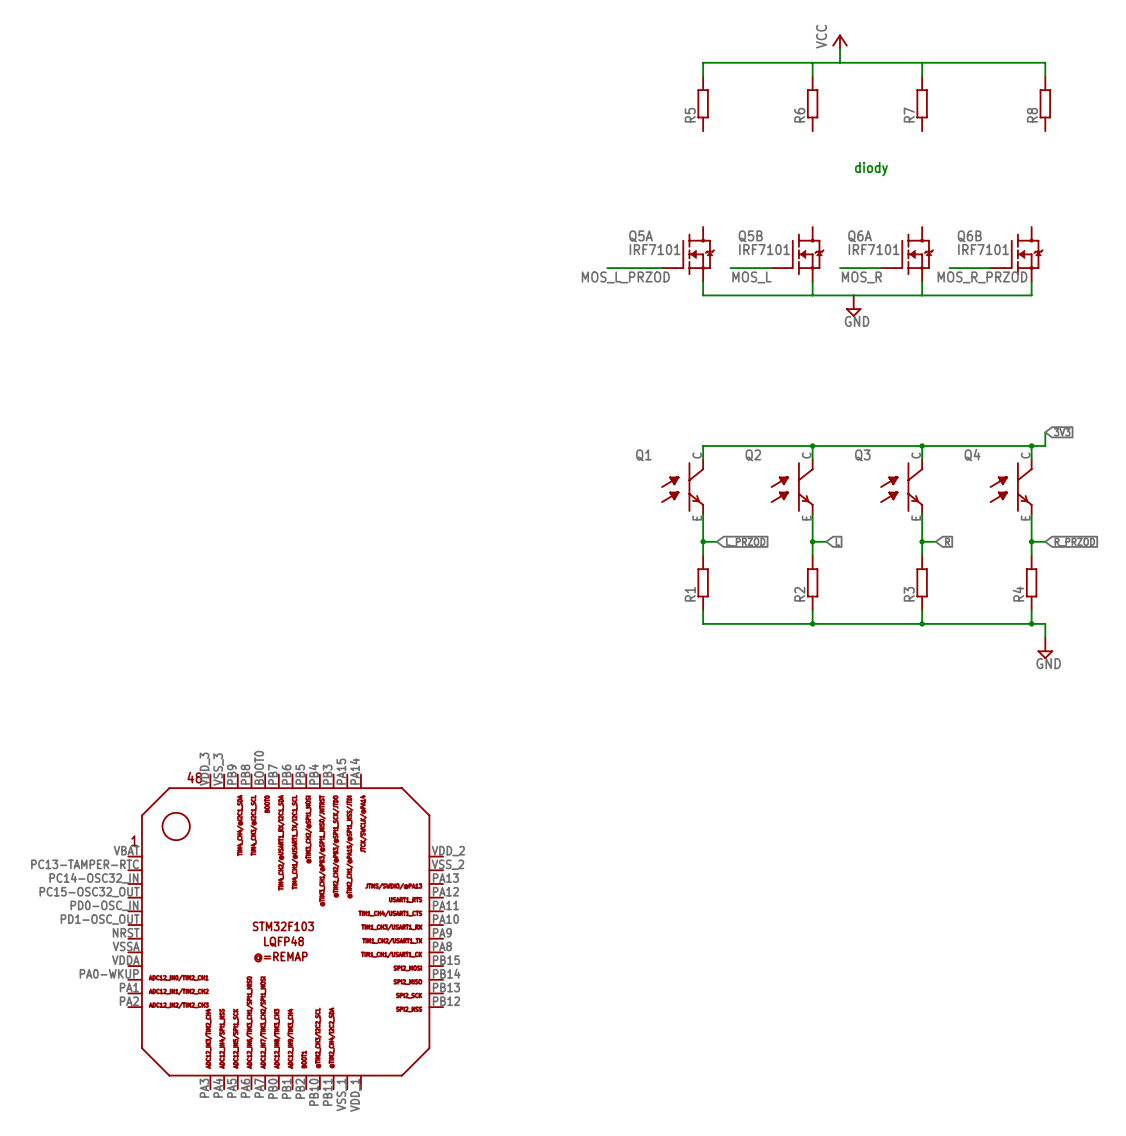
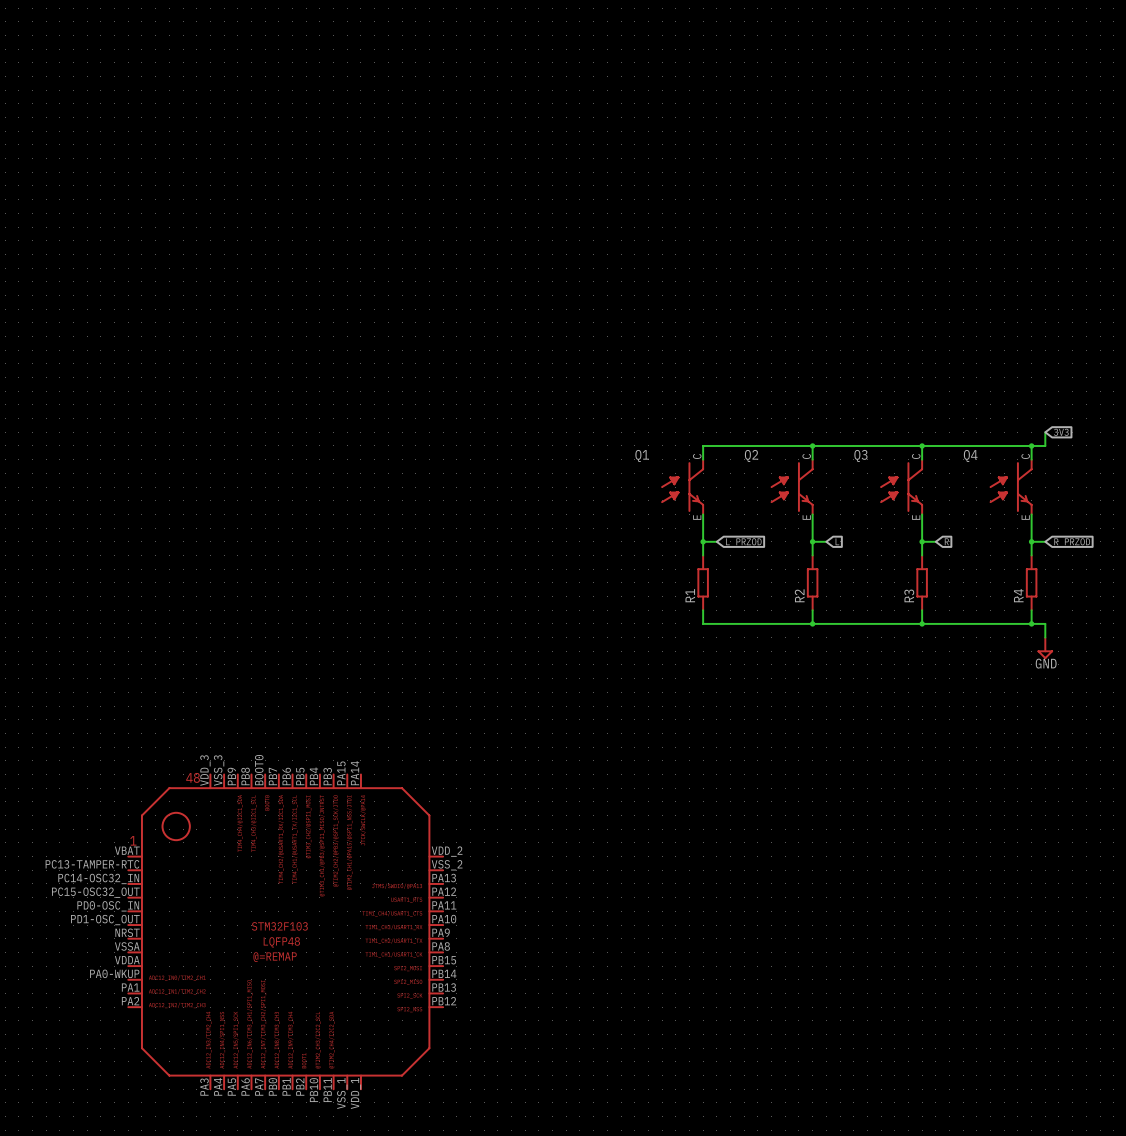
power symbol: VCC (840, 41) -> none
wire: (840, 49) (840, 62) -> none
wire: (812, 62) (812, 76) -> none
wire: (922, 62) (922, 76) -> none
wire: (703, 76) (703, 62) (1045, 62) (1045, 76) -> none
R5: (703, 103) -> none
R6: (812, 103) -> none
R7: (922, 103) -> none
R8: (1045, 103) -> none
text: diody (871, 169) -> none
Q5A: IRF7101 (688, 254) -> none
Q5B: IRF7101 (797, 254) -> none
Q6A: IRF7101 (907, 254) -> none
Q6B: IRF7101 (1016, 254) -> none
wire: (607, 268) (662, 268) -> none
wire: (730, 268) (771, 268) -> none
wire: (840, 268) (881, 268) -> none
wire: (949, 268) (990, 268) -> none
label: MOS_L_PRZOD (625, 277) -> none
label: MOS_L (751, 277) -> none
label: MOS_R (861, 277) -> none
label: MOS_R_PRZOD (982, 277) -> none
wire: (703, 281) (703, 295) (1031, 295) (1031, 281) -> none
wire: (812, 281) (812, 295) -> none
wire: (922, 281) (922, 295) -> none
power symbol: GND (853, 306) -> none

